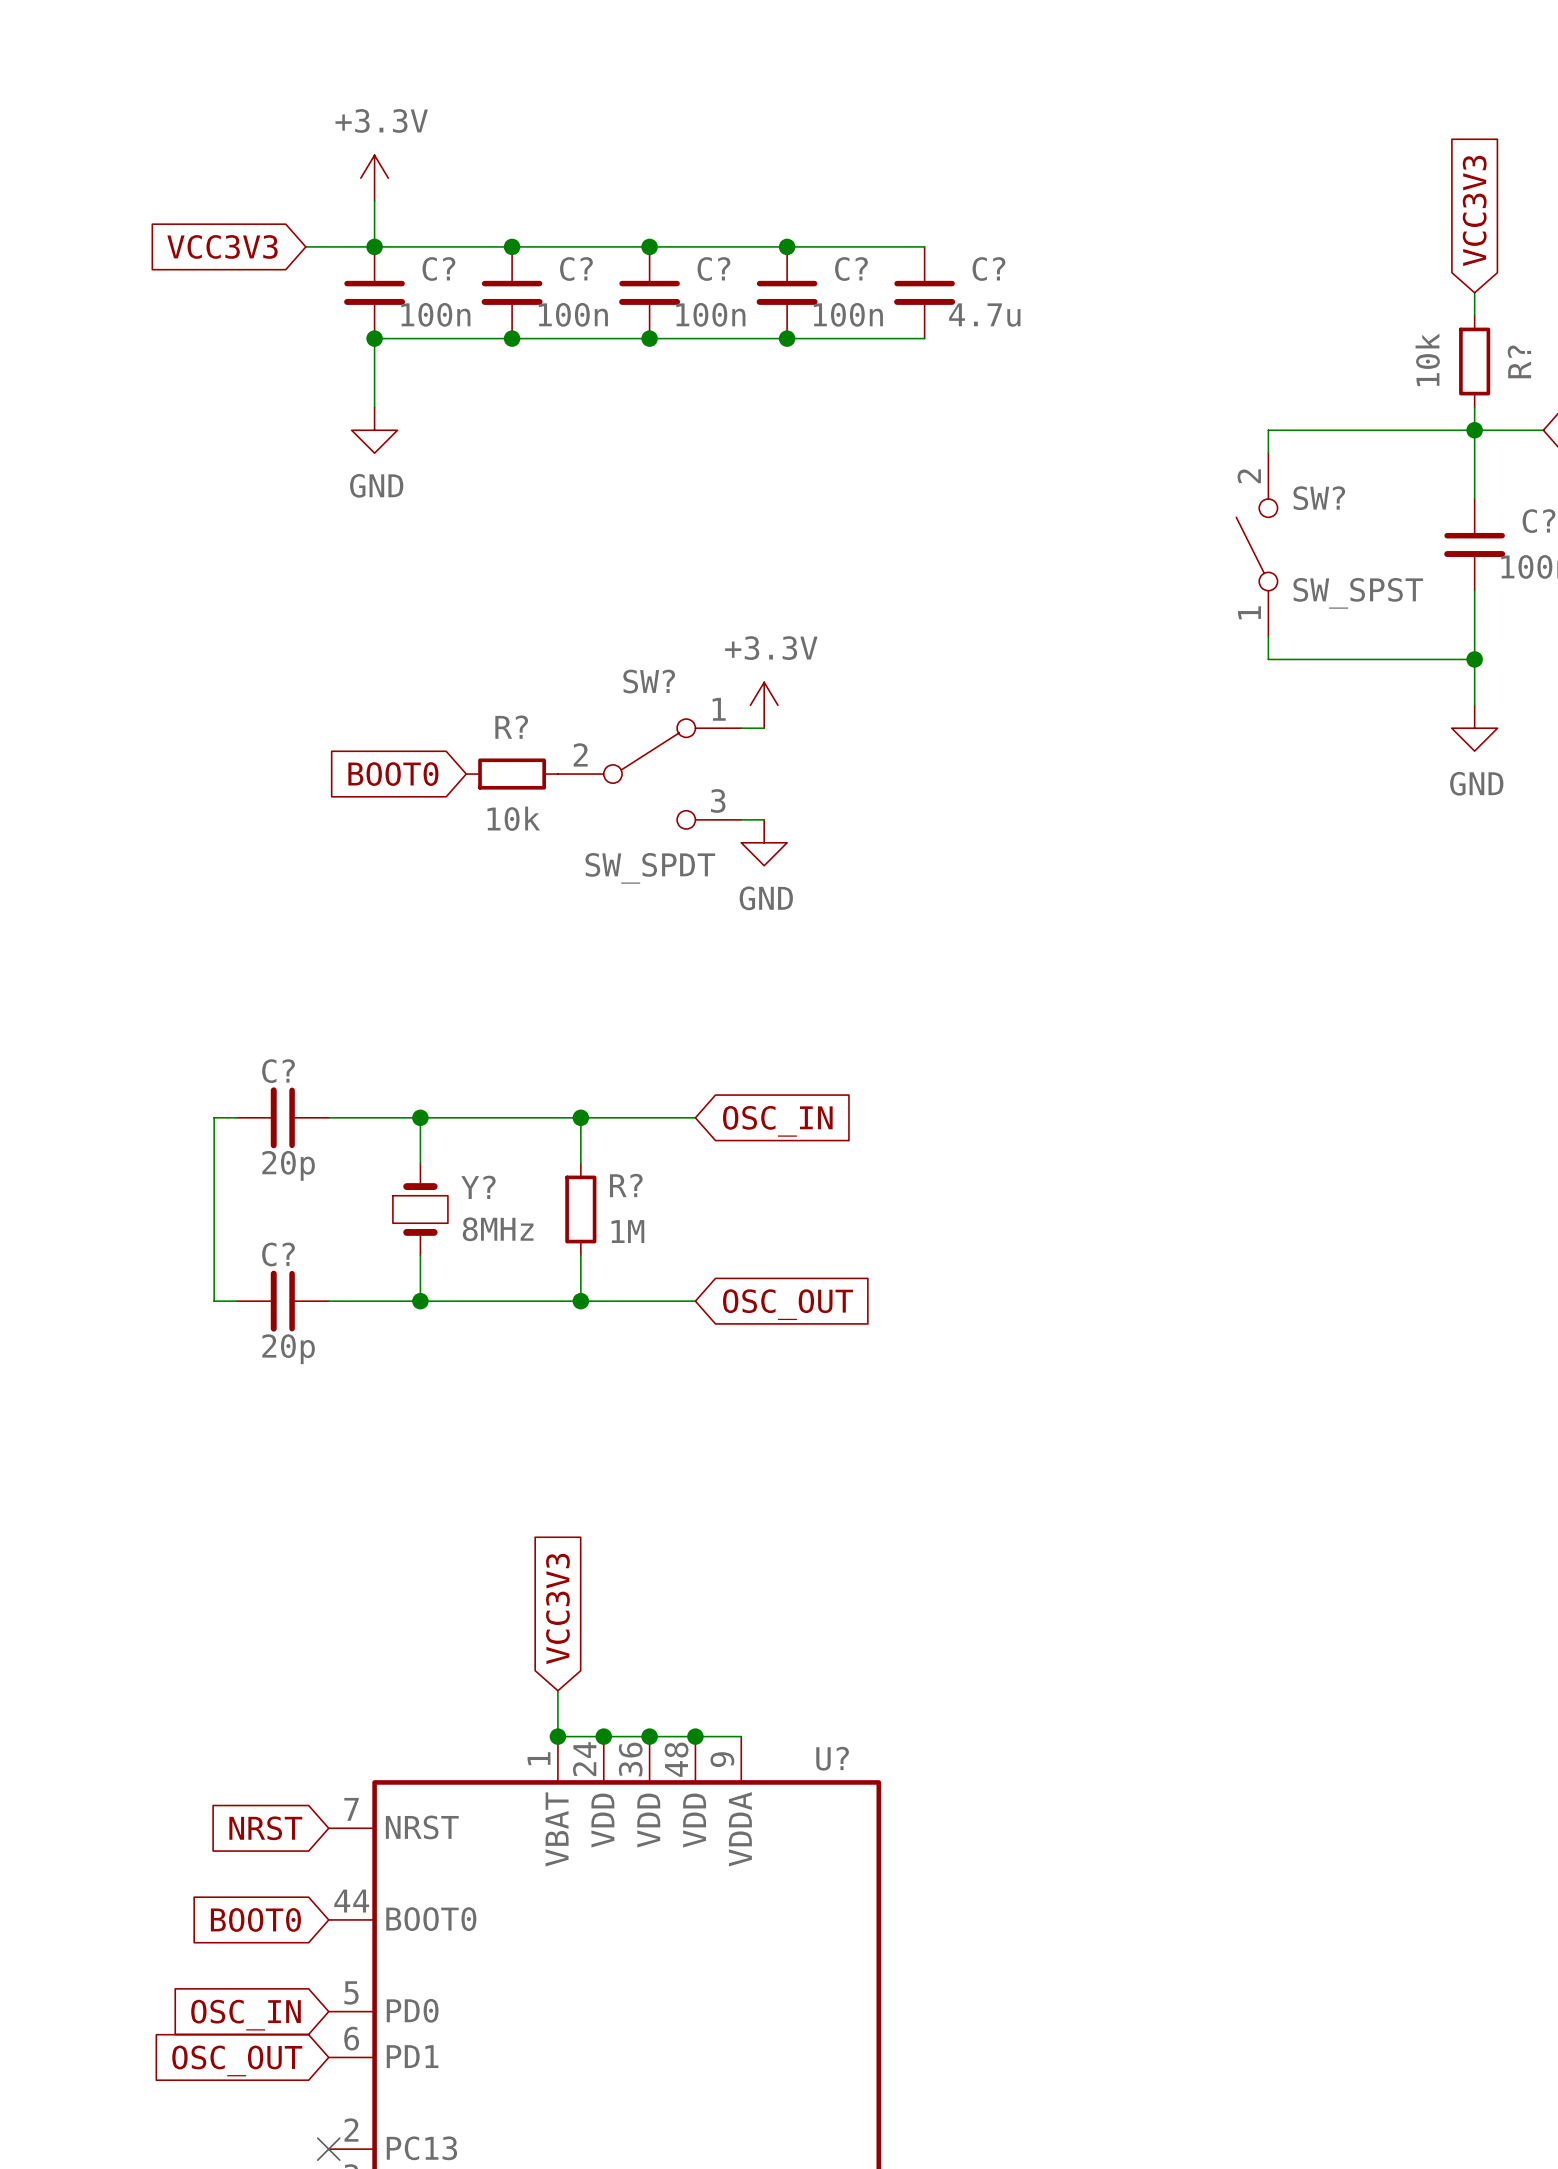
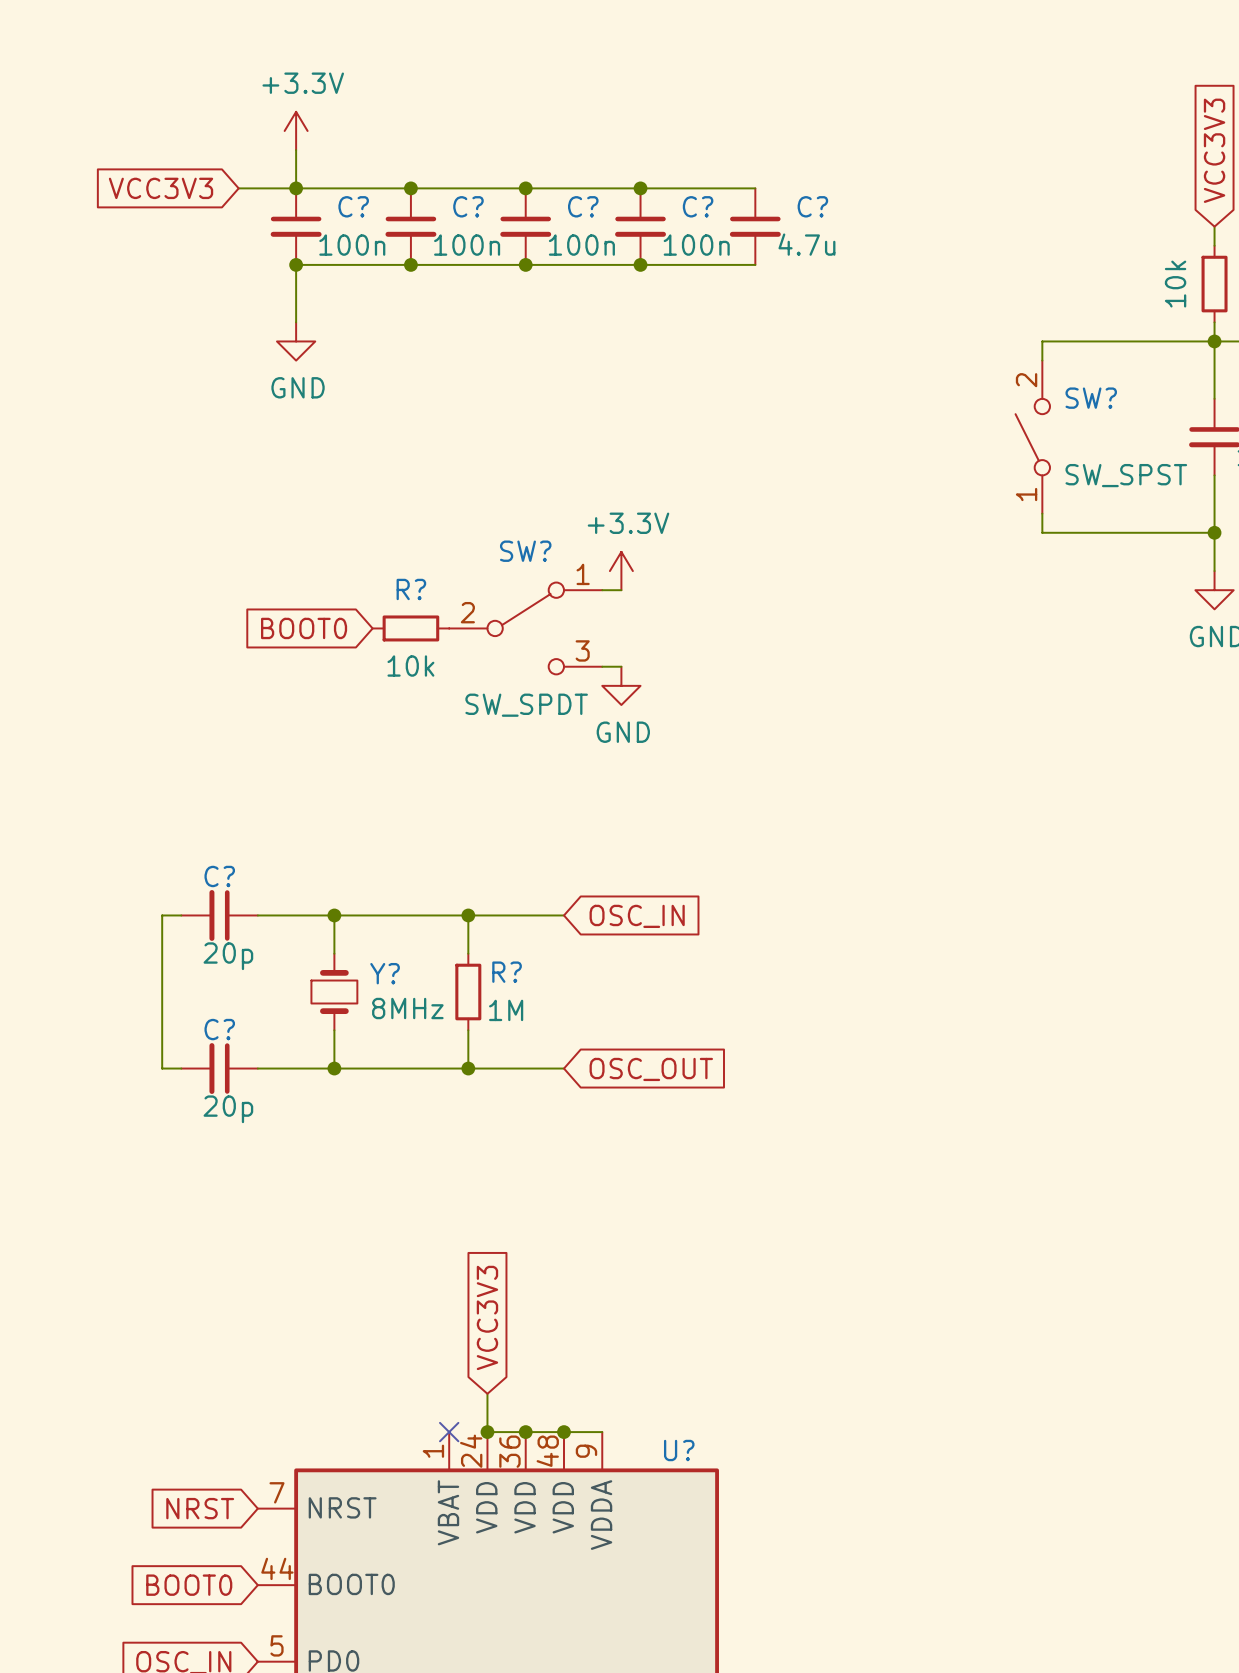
global label position: VCC3V3 (557, 1608) -> VCC3V3 (487, 1317)
wire: (557, 1690) (557, 1736) (603, 1736) -> (487, 1393) (487, 1432)
junction: (557, 1736) -> none
no-connect mark: none -> (449, 1432)

